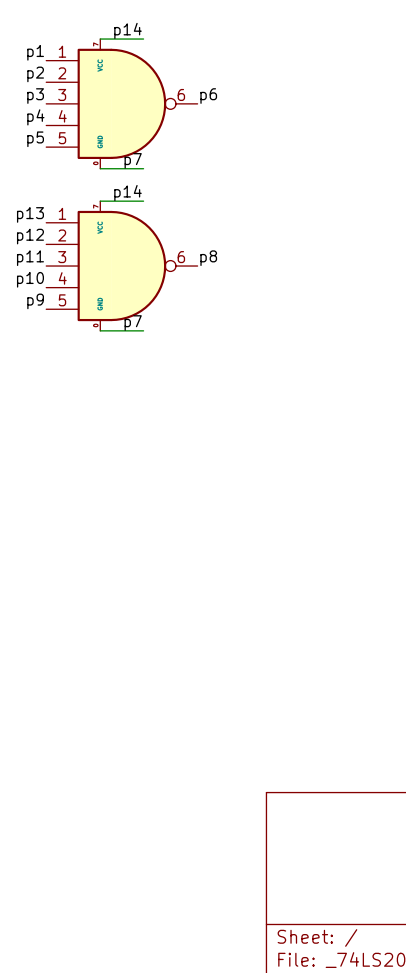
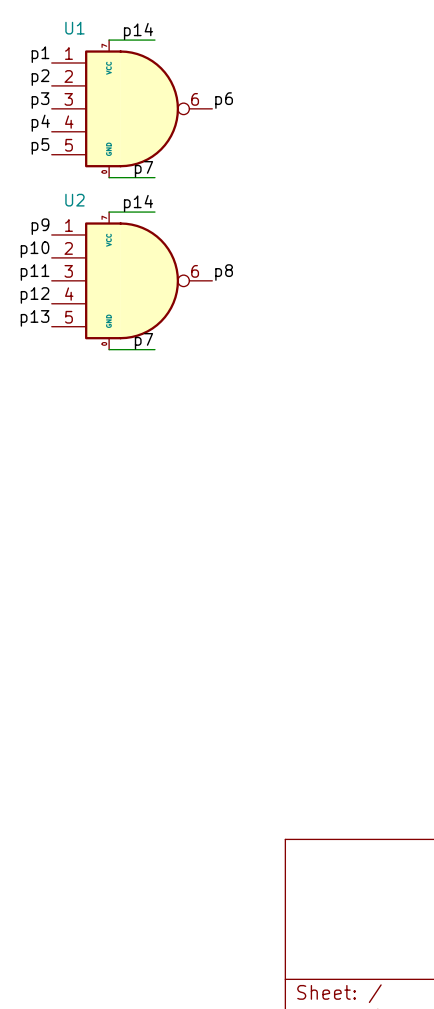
U1 name: none -> U1 (74, 28)
U2 name: none -> U2 (74, 200)
label: p13 (30, 214) -> p9 (40, 226)
label: p12 (30, 236) -> p10 (35, 249)
label: p10 (30, 279) -> p12 (35, 295)
label: p9 (35, 301) -> p13 (35, 318)

